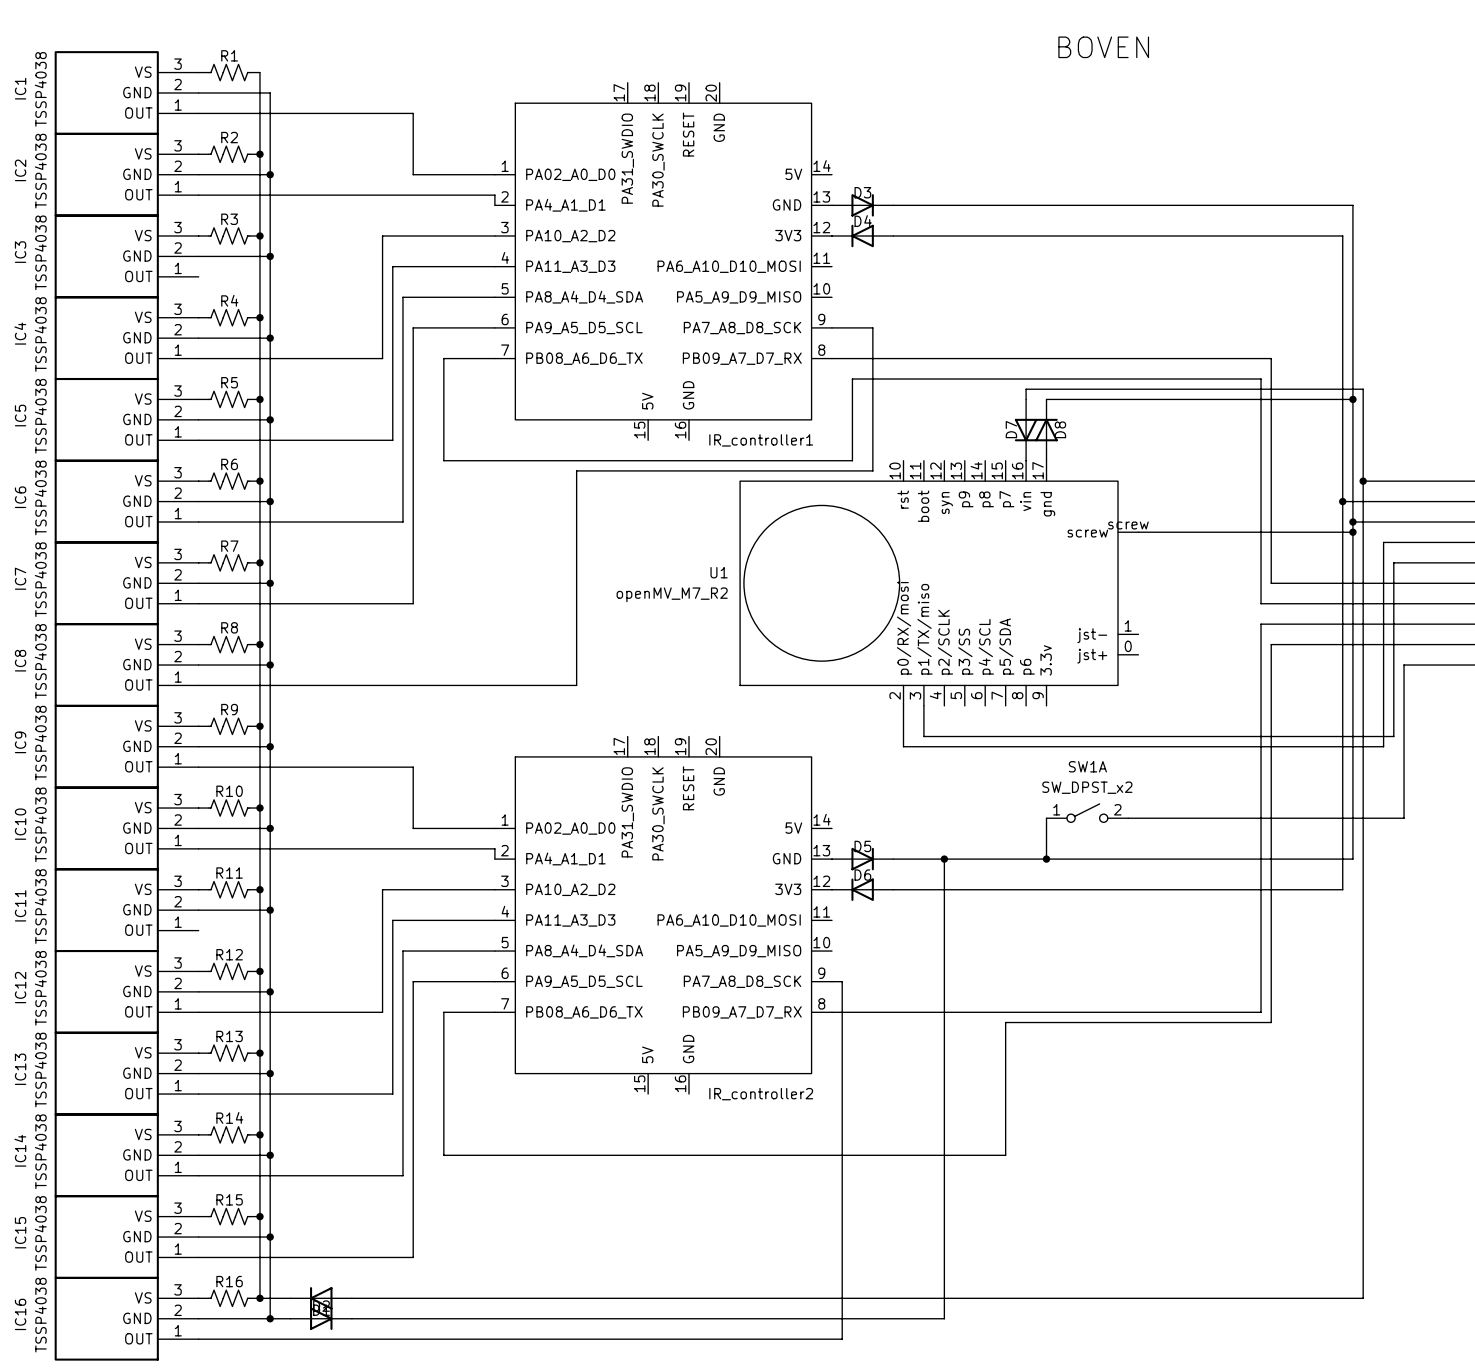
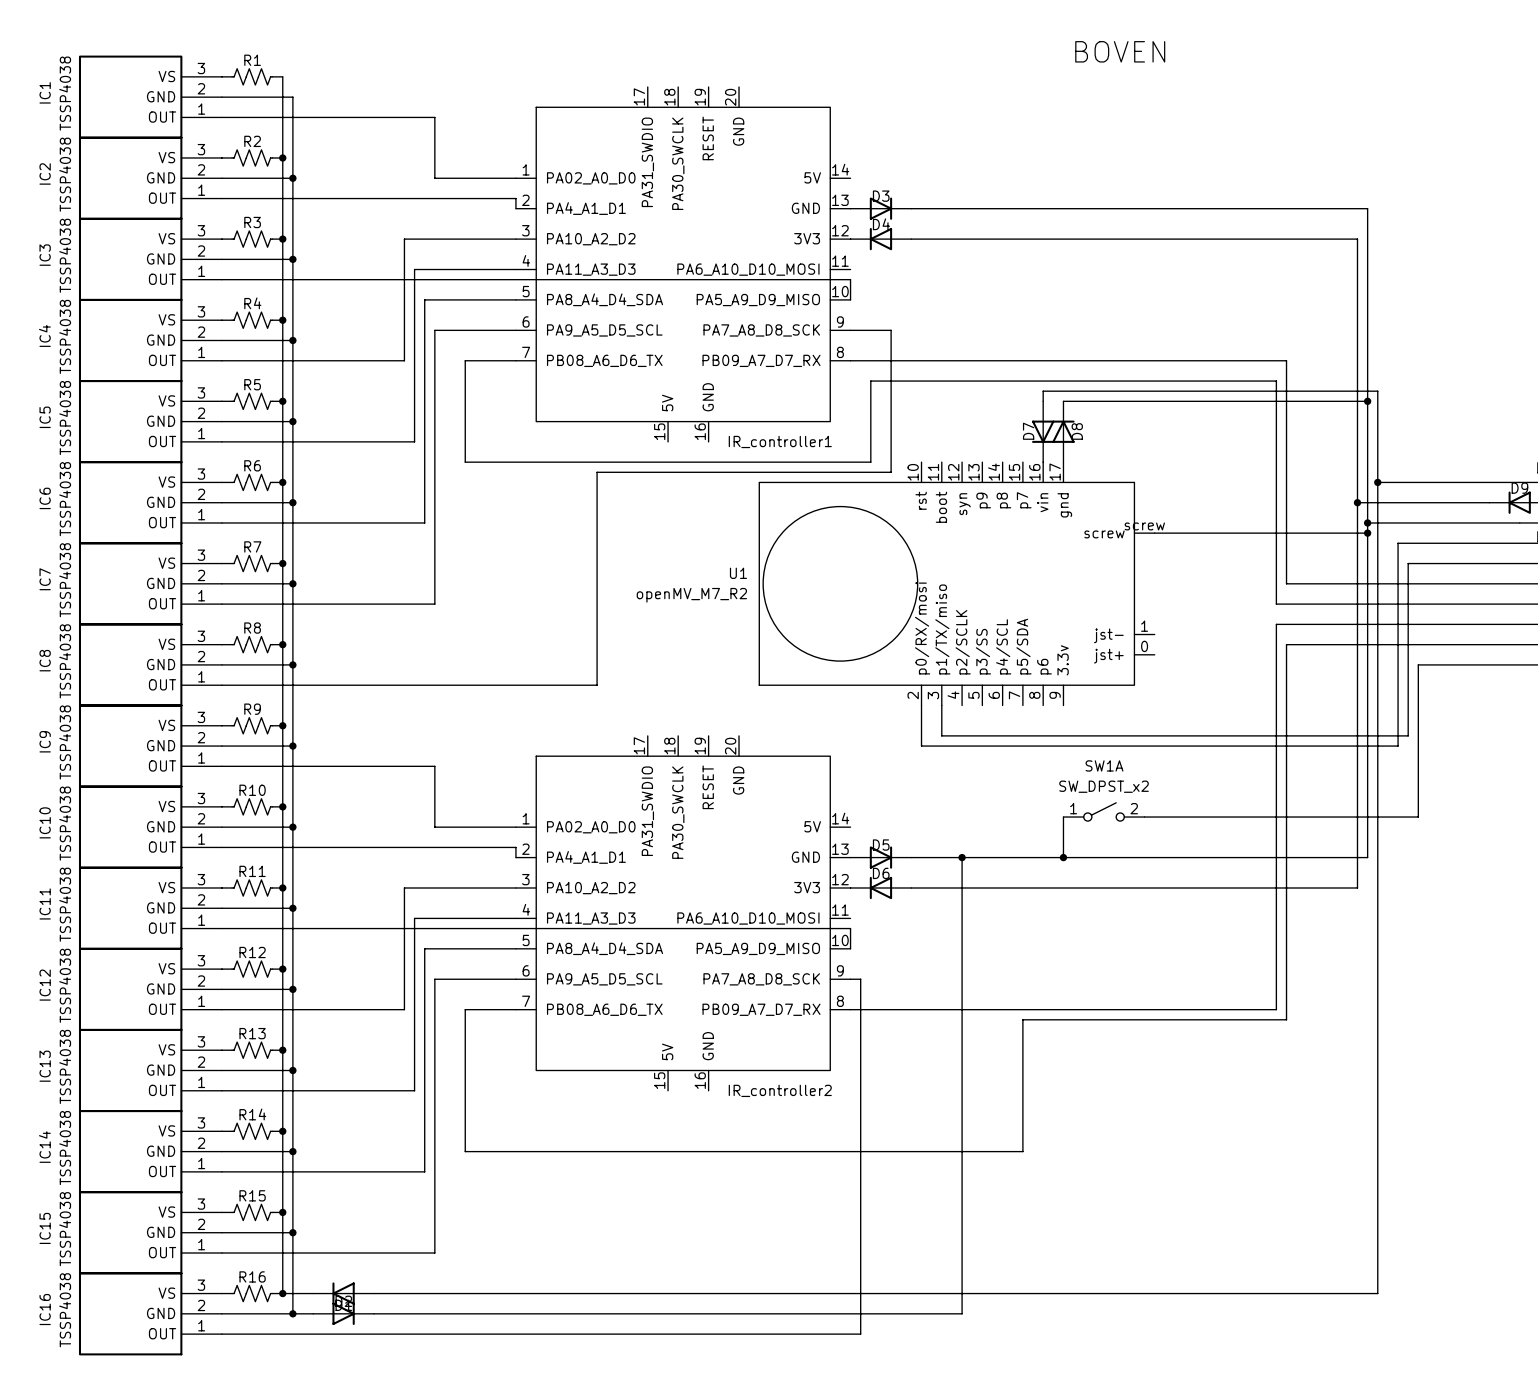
wire: none -> (221, 279) (850, 279) (850, 299)
wire: none -> (221, 928) (850, 928) (850, 948)

